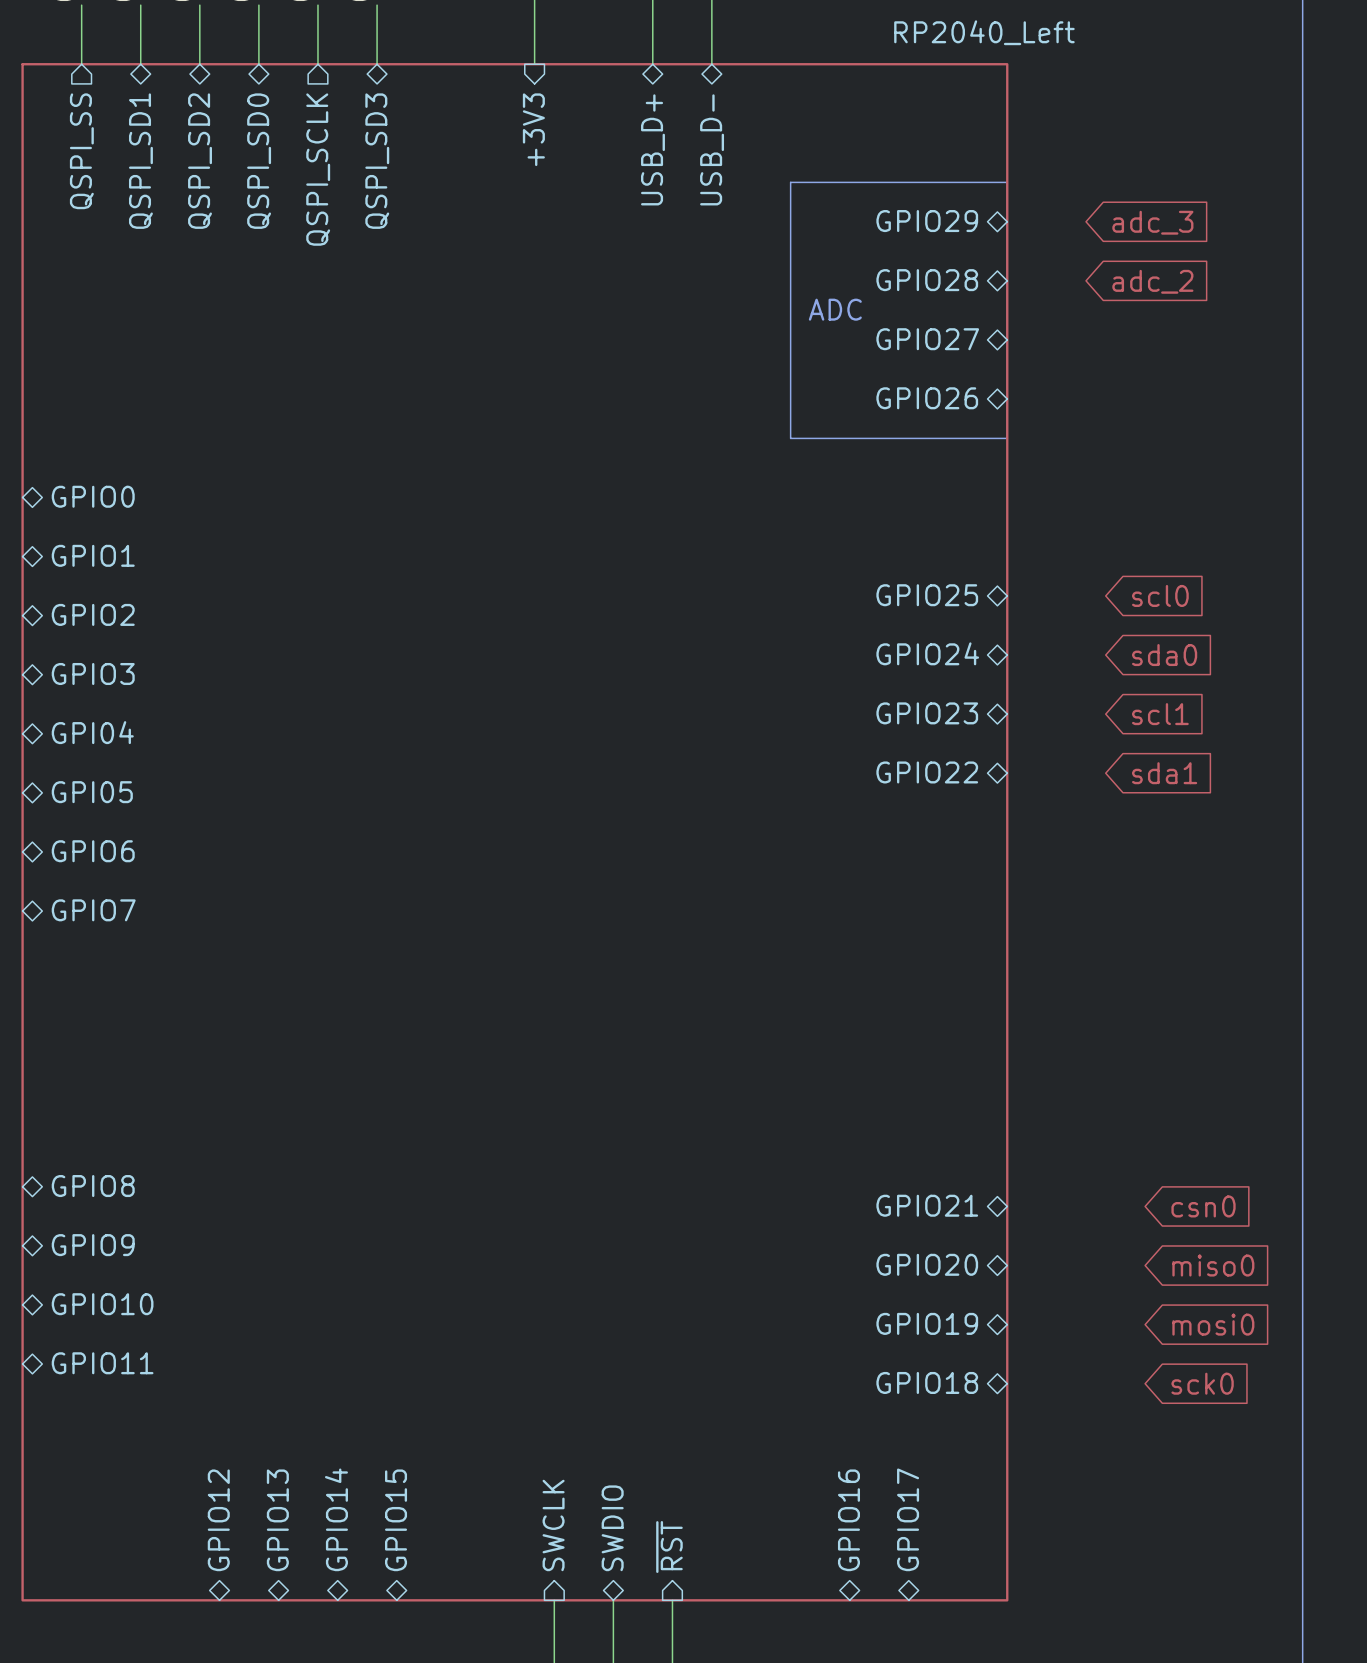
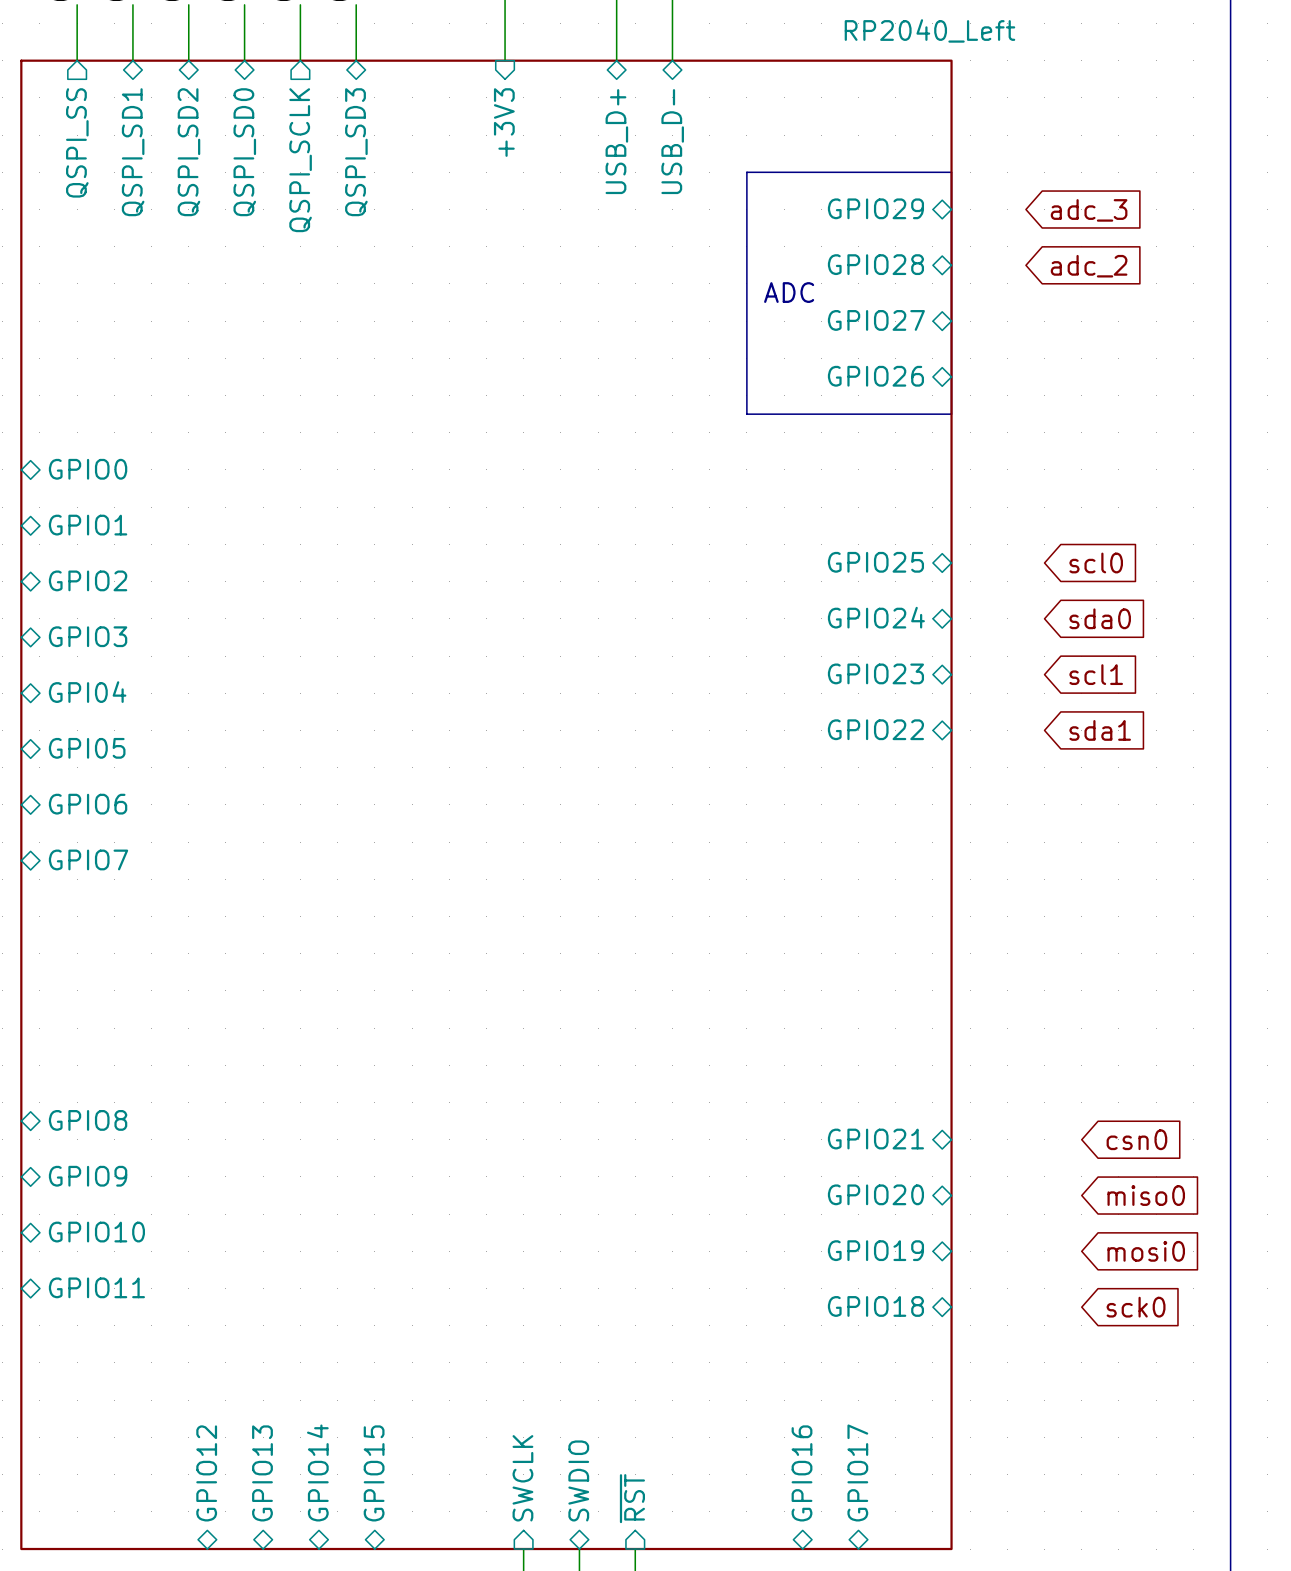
sheet RP2040_Left shape: [21, 63, 1009, 1602] -> [20, 59, 953, 1551]
sheet pin position: GPIO14 (336, 1519) -> GPIO14 (317, 1472)
sheet pin position: GPIO17 (908, 1519) -> GPIO17 (857, 1472)
sheet pin position: GPIO12 (218, 1520) -> GPIO12 (206, 1473)
sheet pin position: GPIO13 (277, 1520) -> GPIO13 (262, 1473)
sheet pin position: GPIO15 (396, 1520) -> GPIO15 (374, 1473)
sheet pin position: GPIO16 (848, 1520) -> GPIO16 (802, 1473)
sheet pin position: SWCLK (553, 1525) -> SWCLK (522, 1478)
sheet pin position: SWDIO (612, 1528) -> SWDIO (578, 1480)
sheet pin position: ~{RST} (669, 1547) -> ~{RST} (632, 1498)
wire: (554, 1600) (554, 1639) -> none
wire: (613, 1600) (613, 1639) -> none
wire: (672, 1600) (672, 1639) -> none

